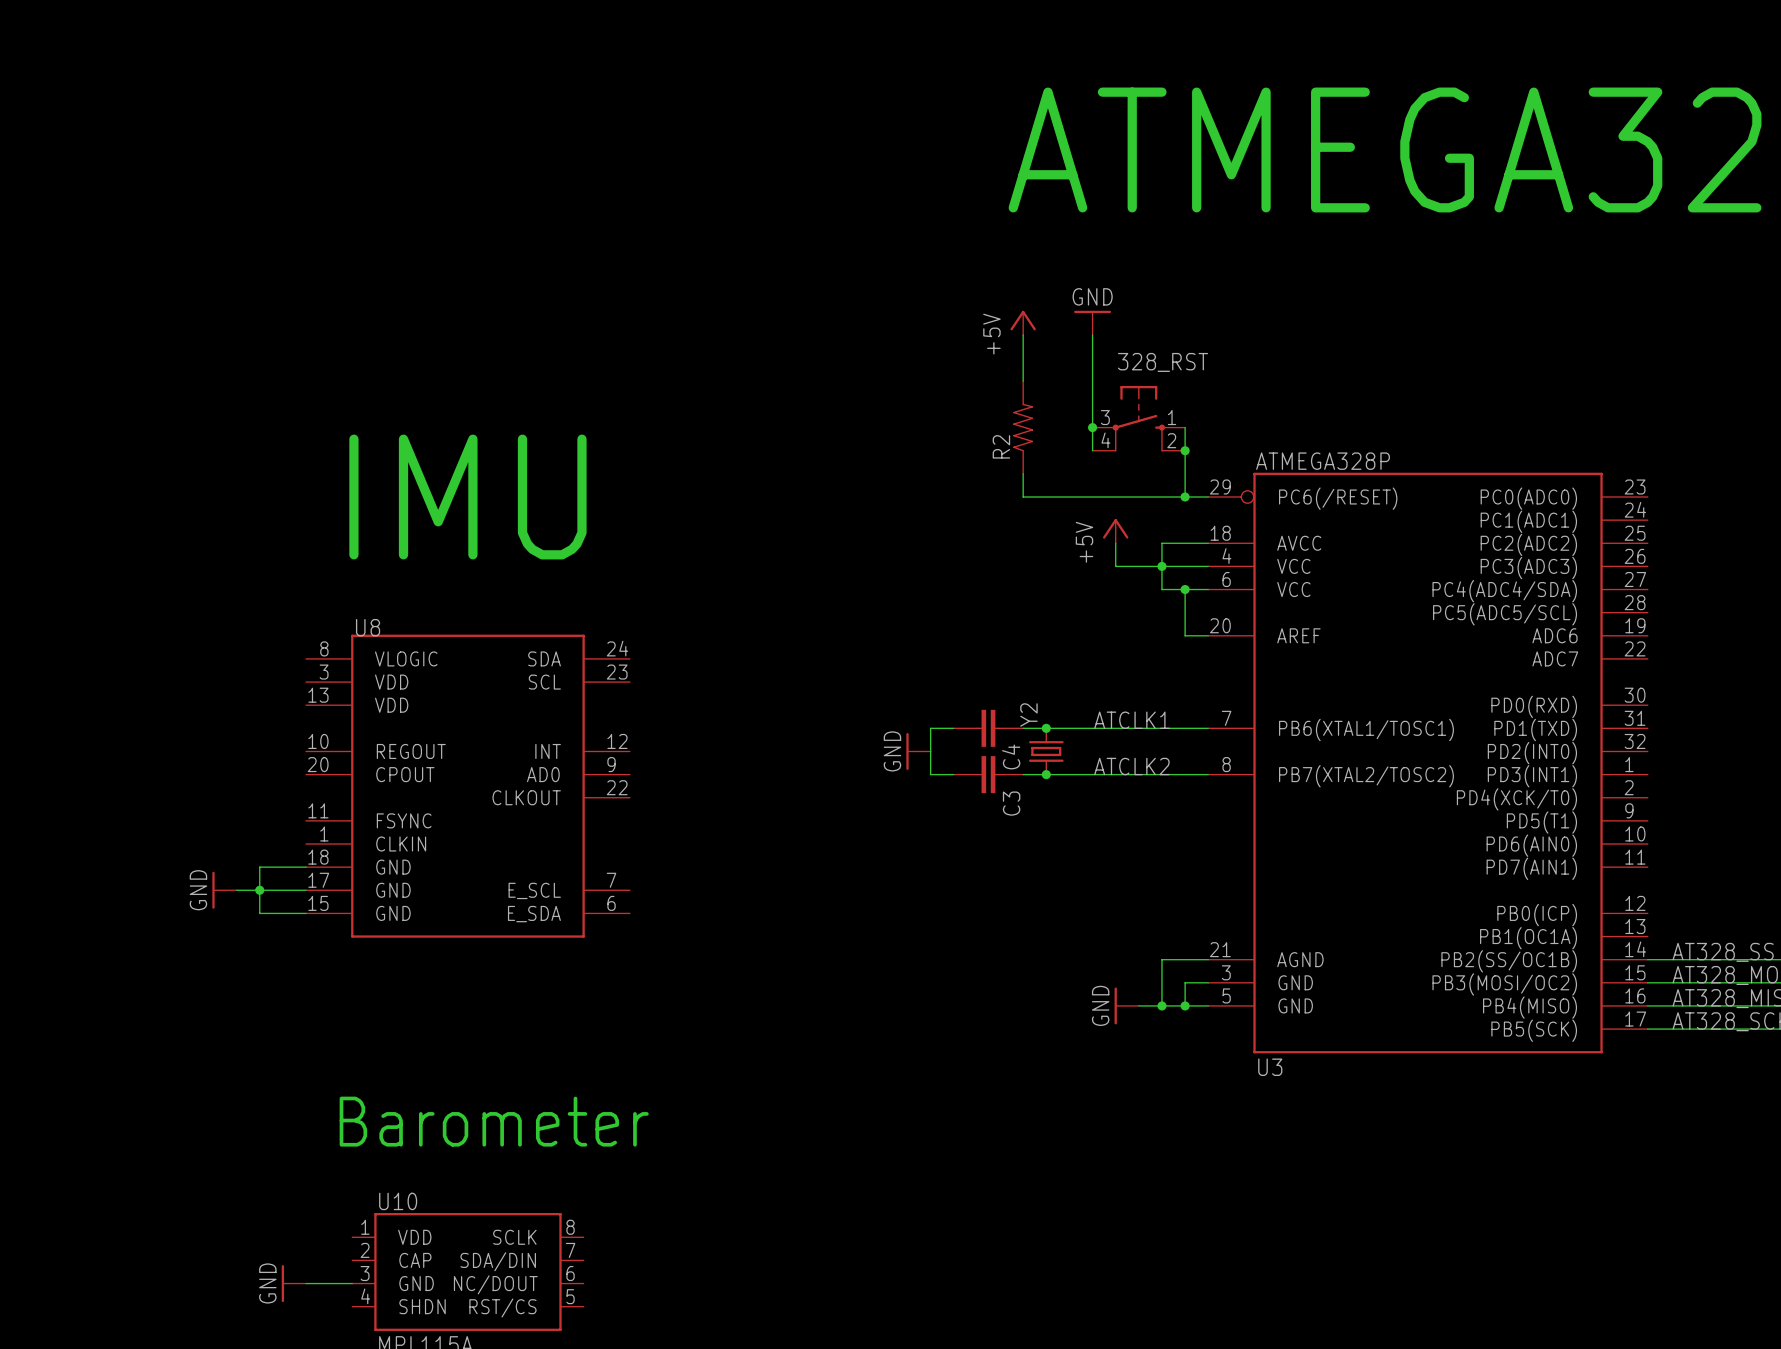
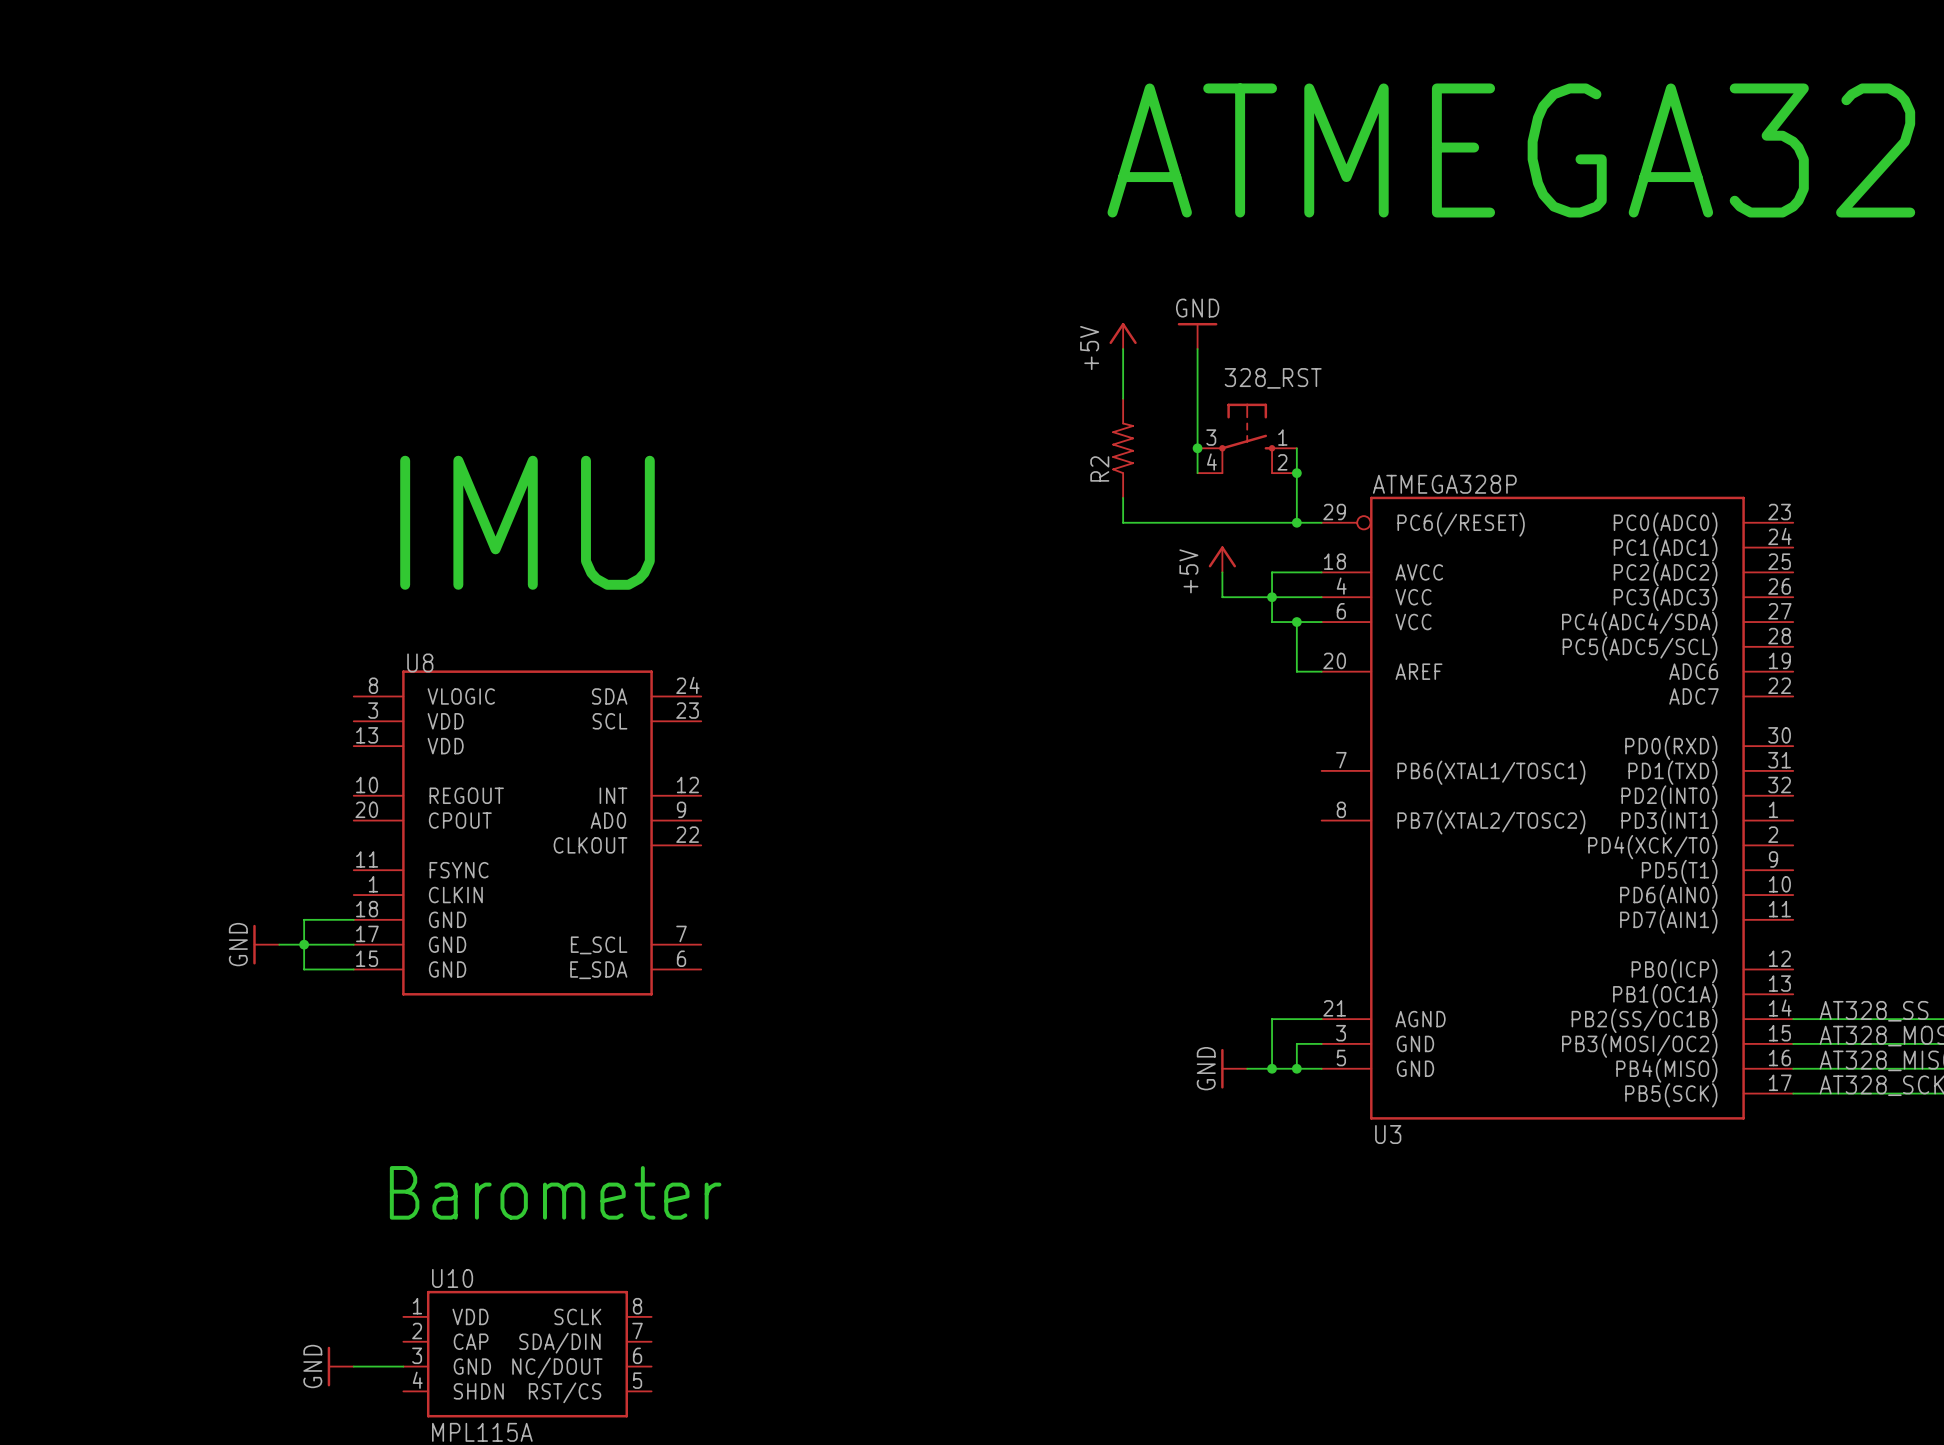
label: ATCLK1 (1131, 720) -> none
wire: (953, 728) (930, 728) (930, 774) (953, 774) -> none
C4: (988, 728) -> none
wire: (1023, 728) (1208, 728) -> none
junction: (1046, 728) -> none
power symbol: GND (918, 751) -> none
Y2: (1046, 751) -> none
label: ATCLK2 (1131, 766) -> none
C3: (988, 774) -> none
wire: (1023, 774) (1208, 774) -> none
junction: (1046, 774) -> none

